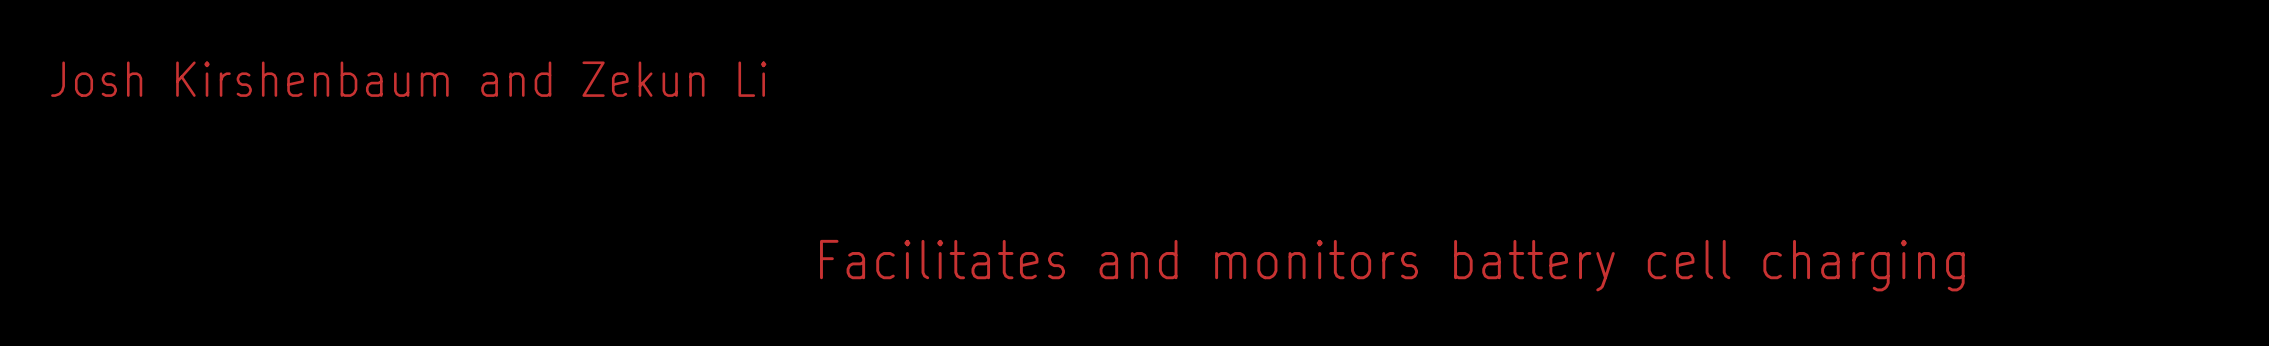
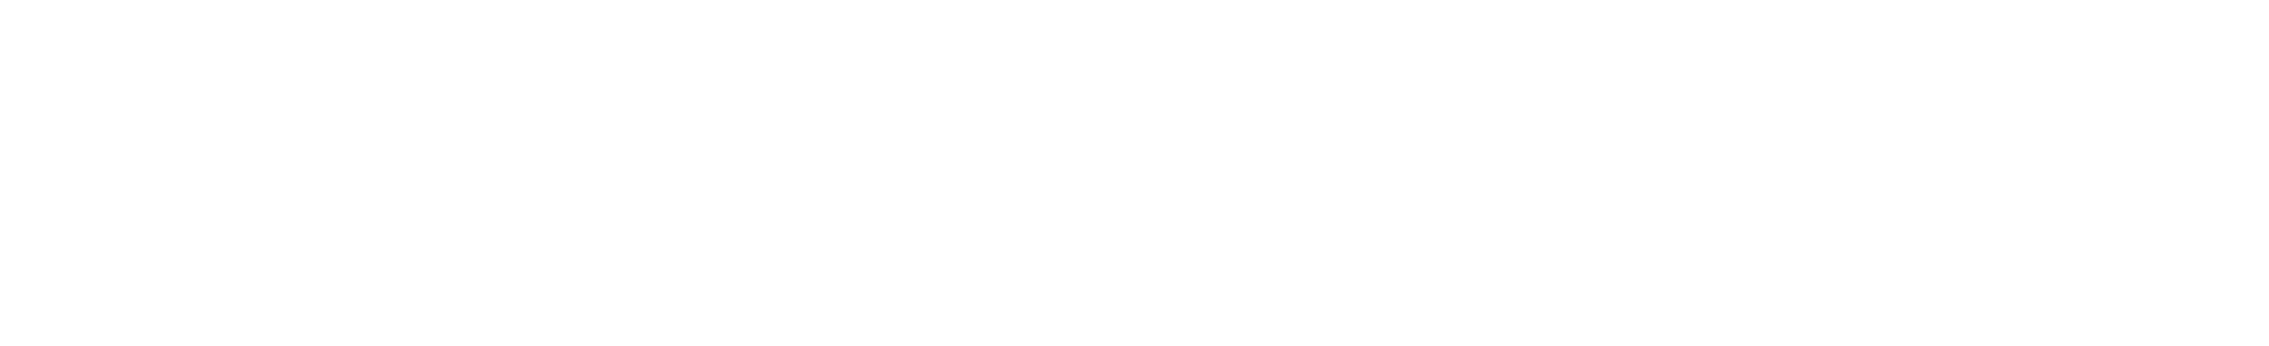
text: Josh Kirshenbaum and Zekun Li (408, 79) -> none
text: Facilitates and monitors battery cell charging (1392, 265) -> none

